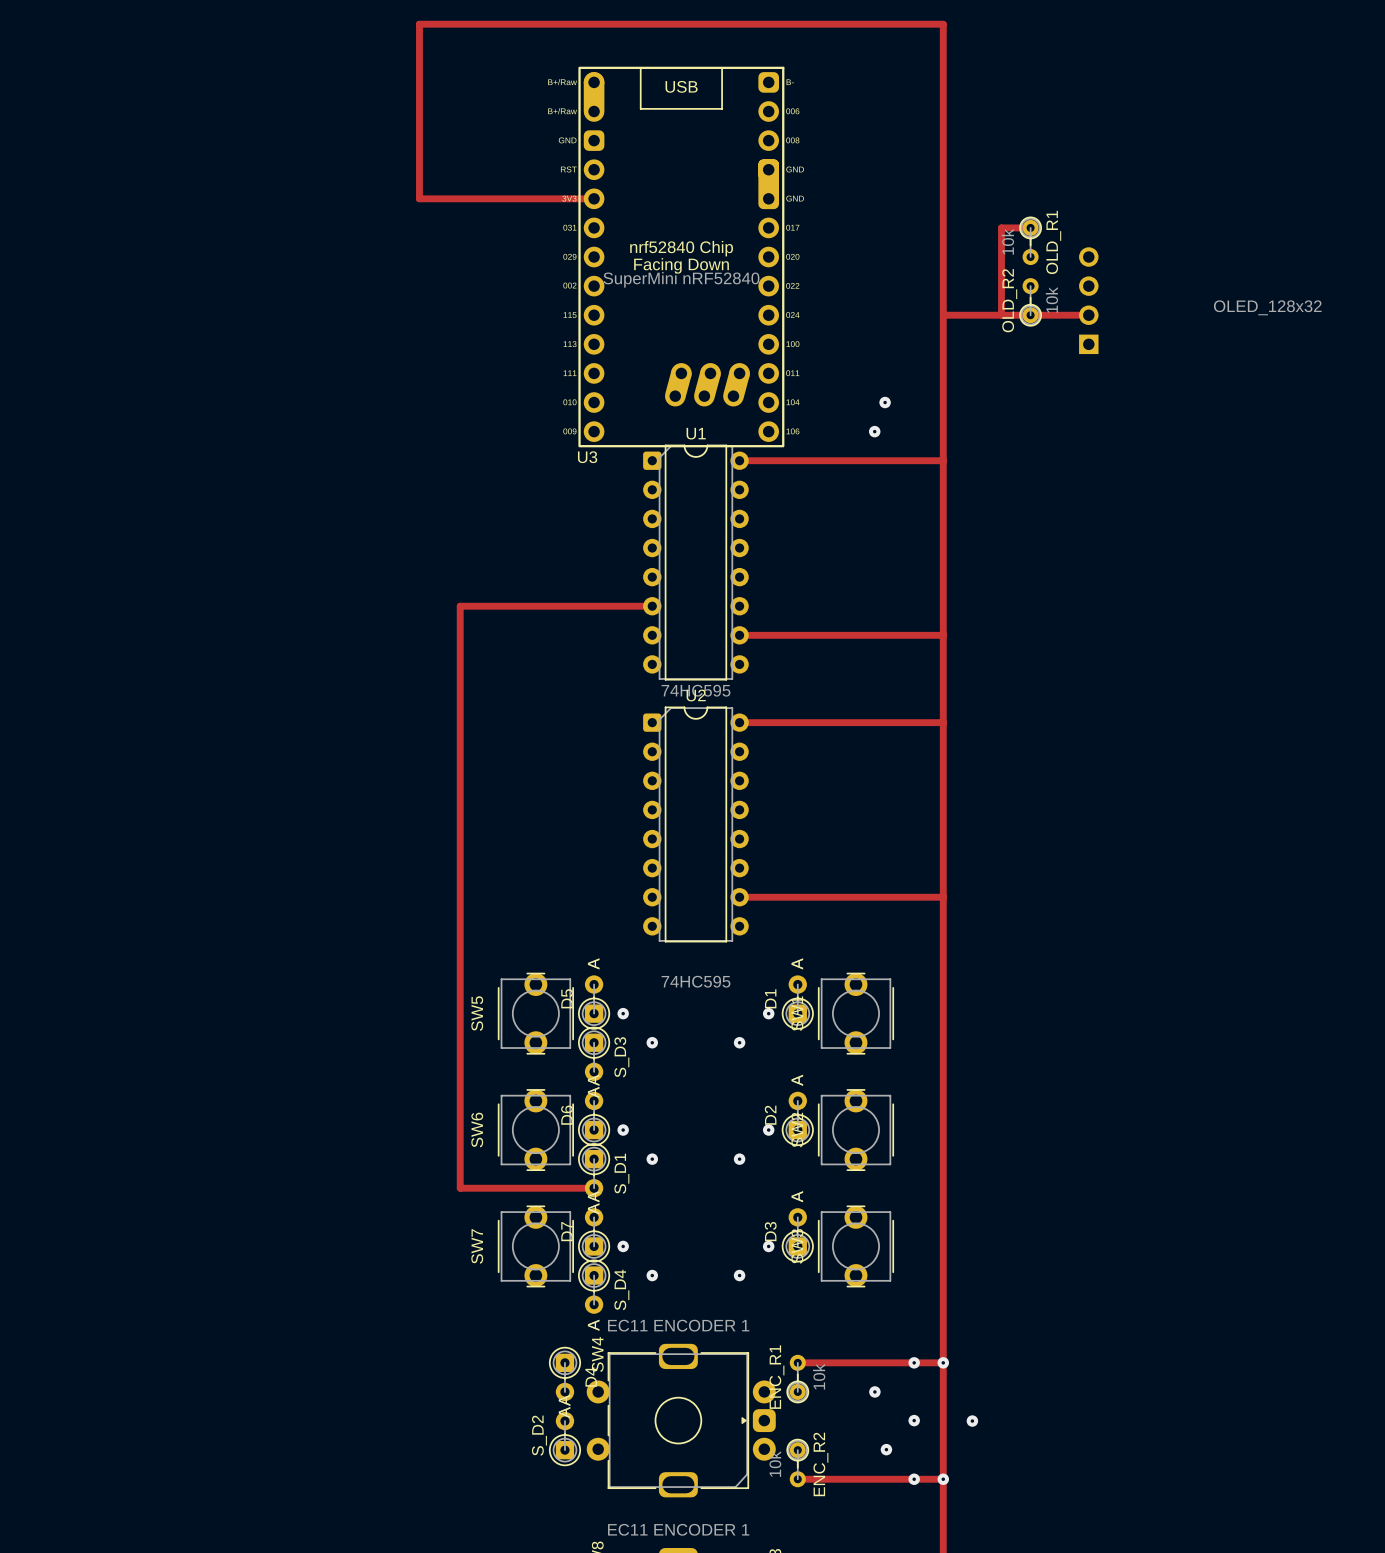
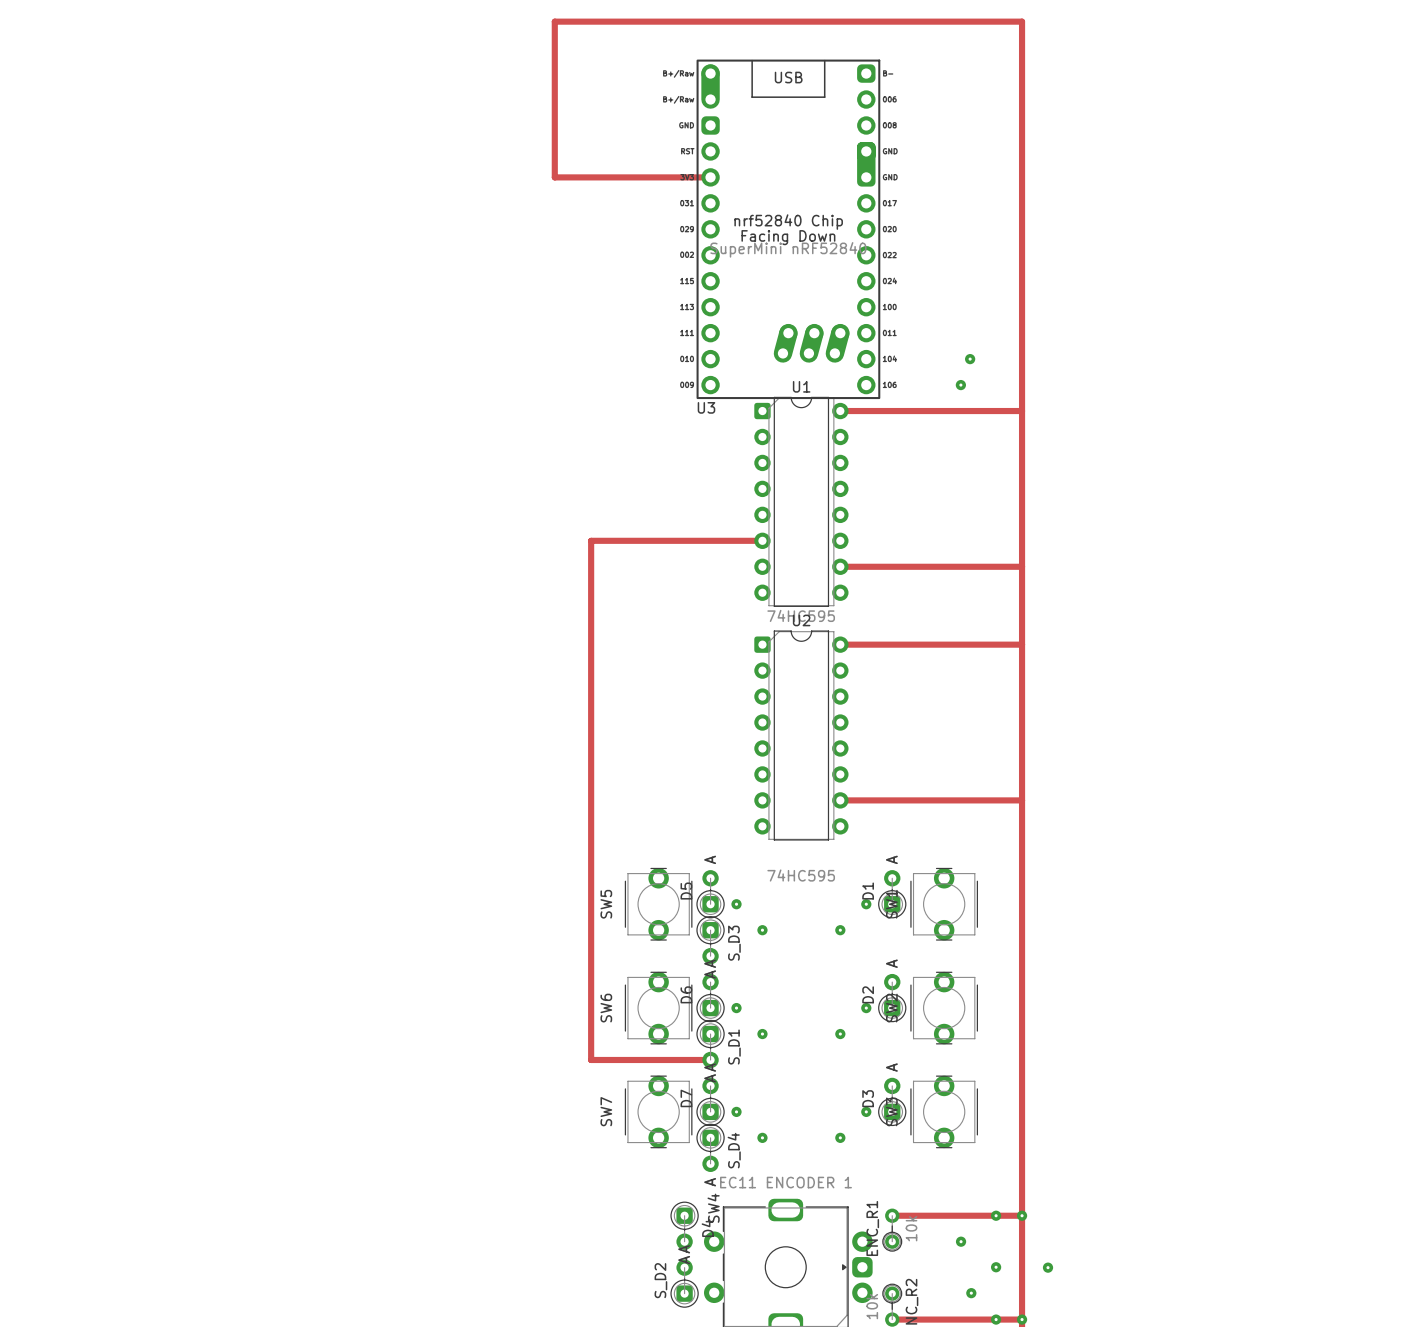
track: (1030, 227) (1001, 227) (1001, 315) -> none
OLD_R1: 10k (1030, 240) -> none
part: OLED_128x32 (1088, 300) -> none
OLD_R2: 10k (1030, 302) -> none
track: (943, 315) (1088, 315) -> none

